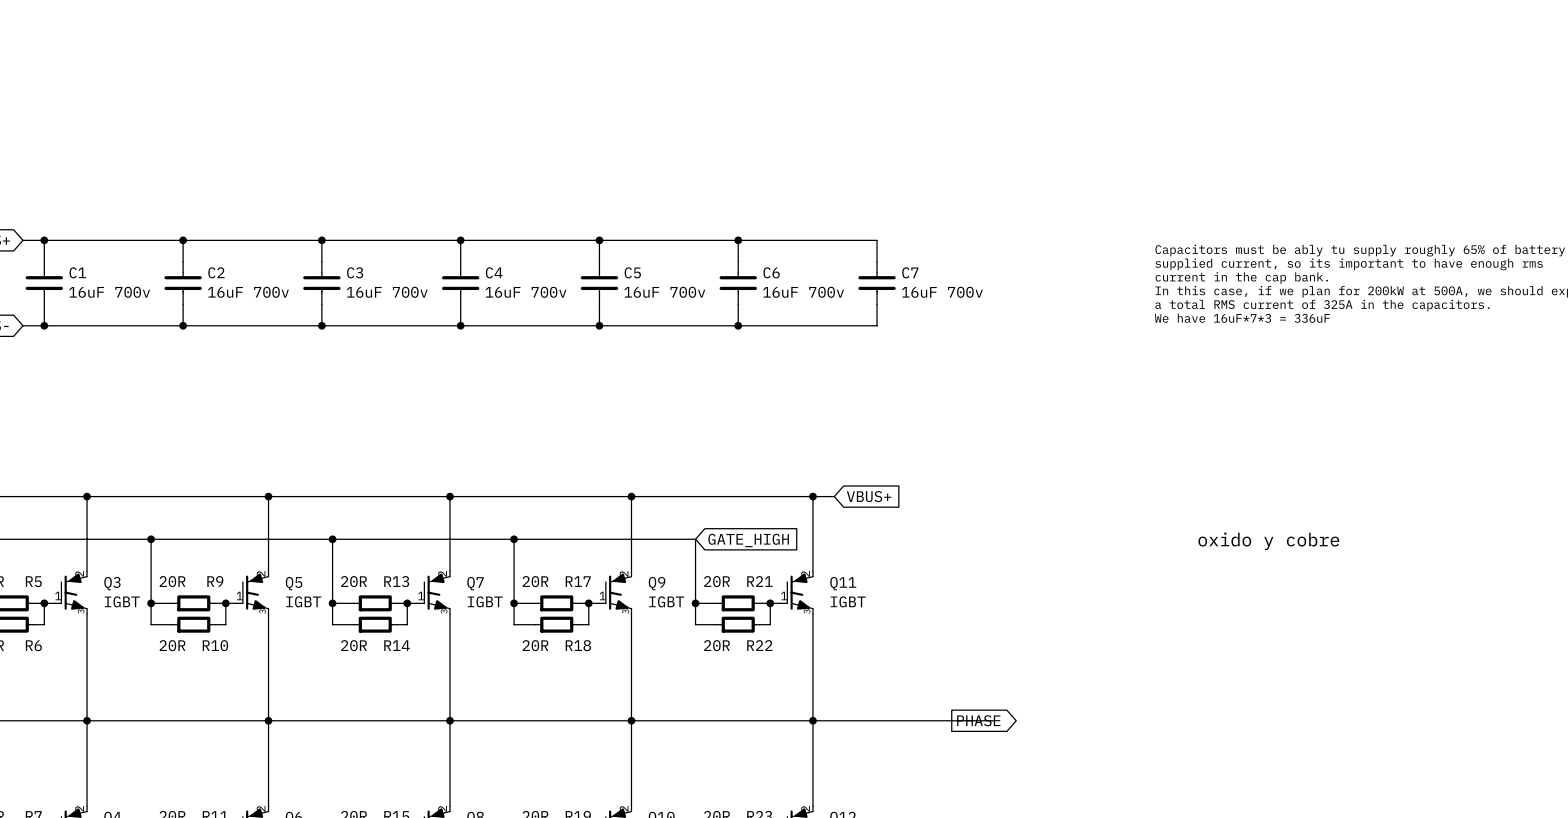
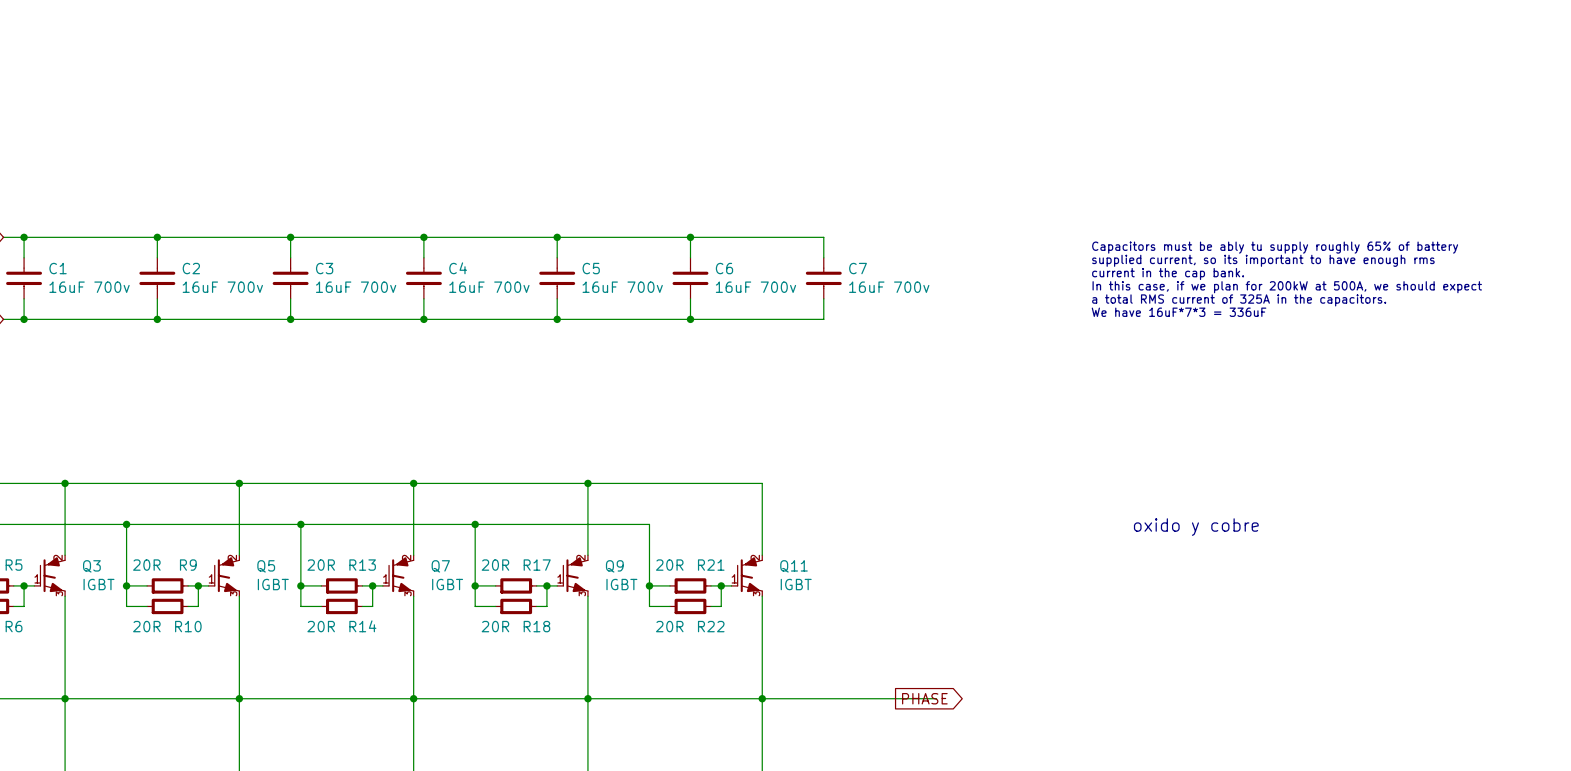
wire: (812, 496) (834, 496) -> none
junction: (812, 496) -> none
global label: VBUS+ (869, 496) -> none
global label: GATE_HIGH (748, 540) -> none

